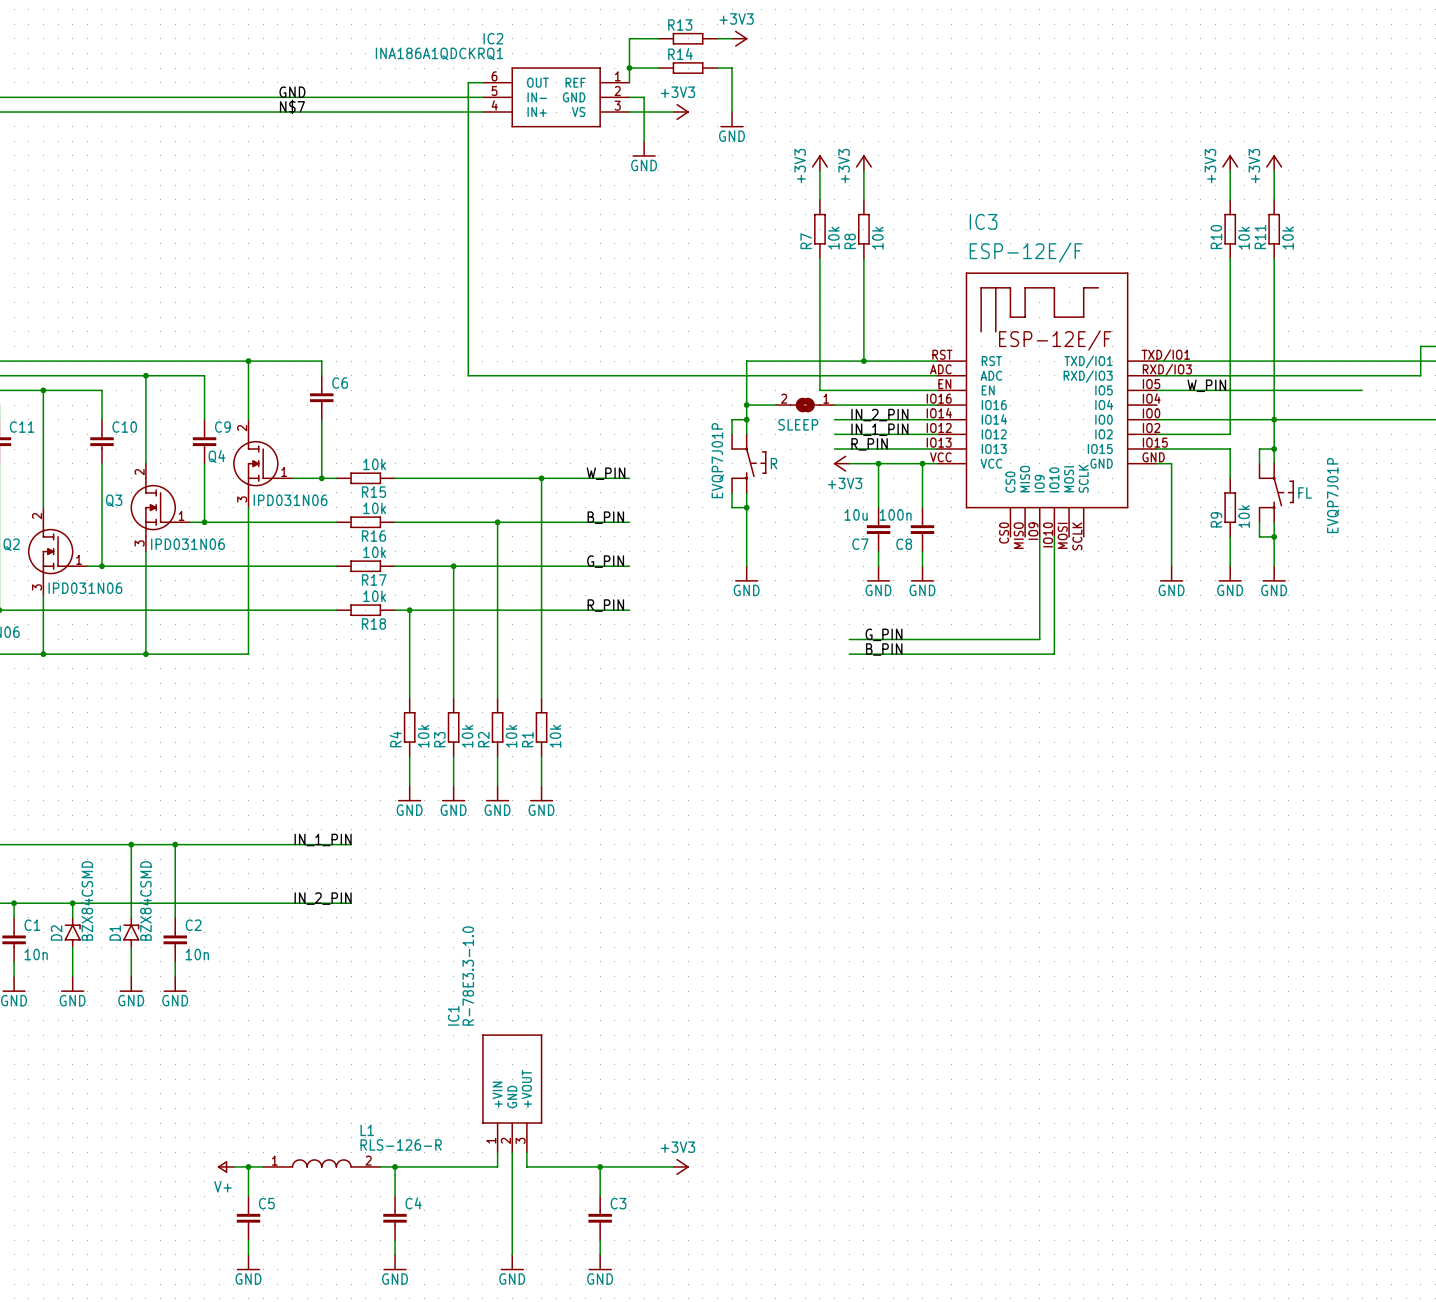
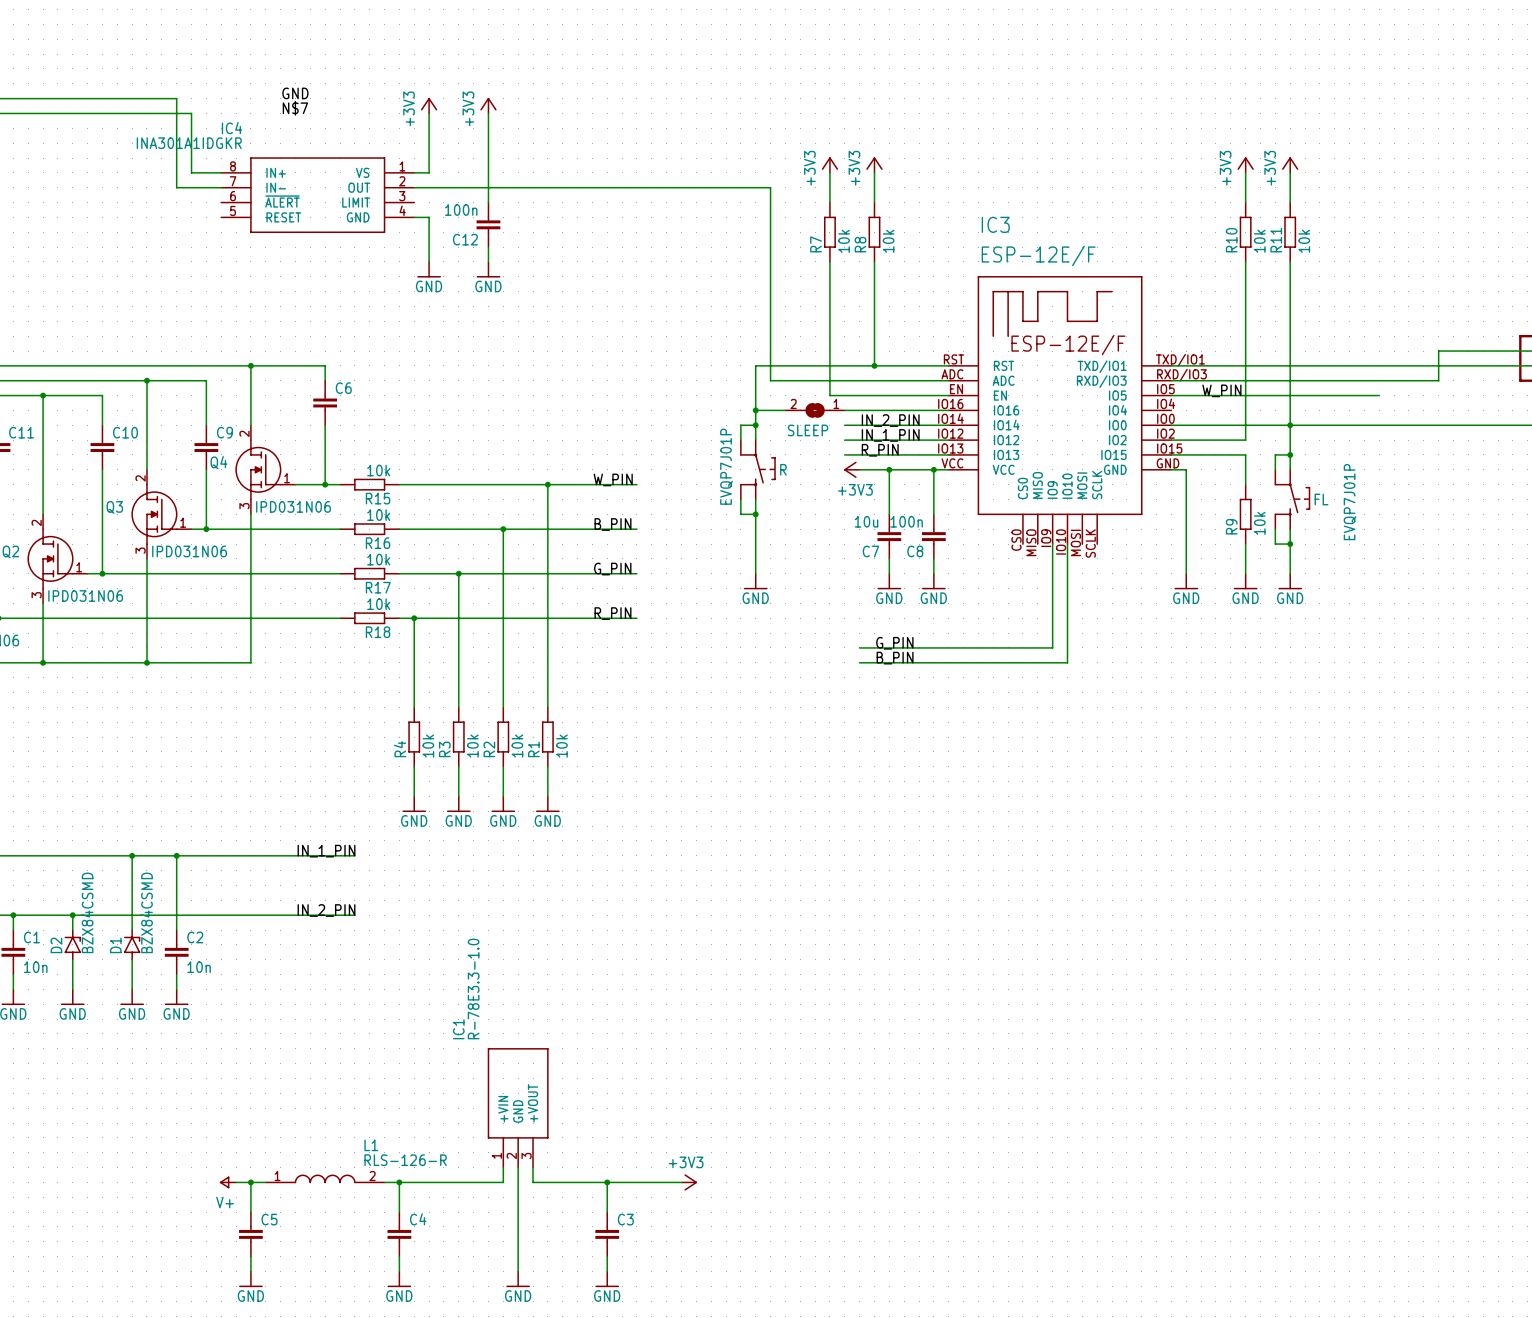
wire: (658, 38) (629, 38) (629, 82) -> none
R13: (688, 38) -> none
wire: (717, 38) (732, 38) -> none
power symbol: +3V3 (739, 38) -> none
wire: (629, 68) (658, 68) -> none
junction: (629, 68) -> none
R14: (688, 68) -> none
wire: (717, 68) (732, 68) (732, 112) -> none
wire: (482, 82) (468, 82) (468, 375) (761, 375) -> (414, 187) (770, 187) (770, 380)
wire: (175, 97) (482, 97) -> (176, 98) (176, 187) (221, 187)
IC2: INA186A1QDCKRQ1 (556, 97) -> none
wire: (629, 97) (644, 97) (644, 141) -> none
power symbol: none -> +3V3 (429, 105)
power symbol: none -> +3V3 (488, 105)
wire: (189, 112) (482, 112) -> (191, 113) (191, 172) (221, 172)
wire: none -> (429, 113) (429, 172) (414, 172)
wire: none -> (488, 113) (488, 202)
wire: (629, 112) (673, 112) -> none
power symbol: +3V3 (681, 112) -> none
power symbol: GND (732, 119) -> none
power symbol: GND (644, 149) -> none
IC4: none -> INA301A1IDGKR (317, 195)
wire: none -> (414, 217) (429, 217) (429, 261)
C12: none -> 100n (488, 224)
wire: none -> (488, 247) (488, 261)
power symbol: none -> GND (429, 269)
power symbol: none -> GND (488, 269)

